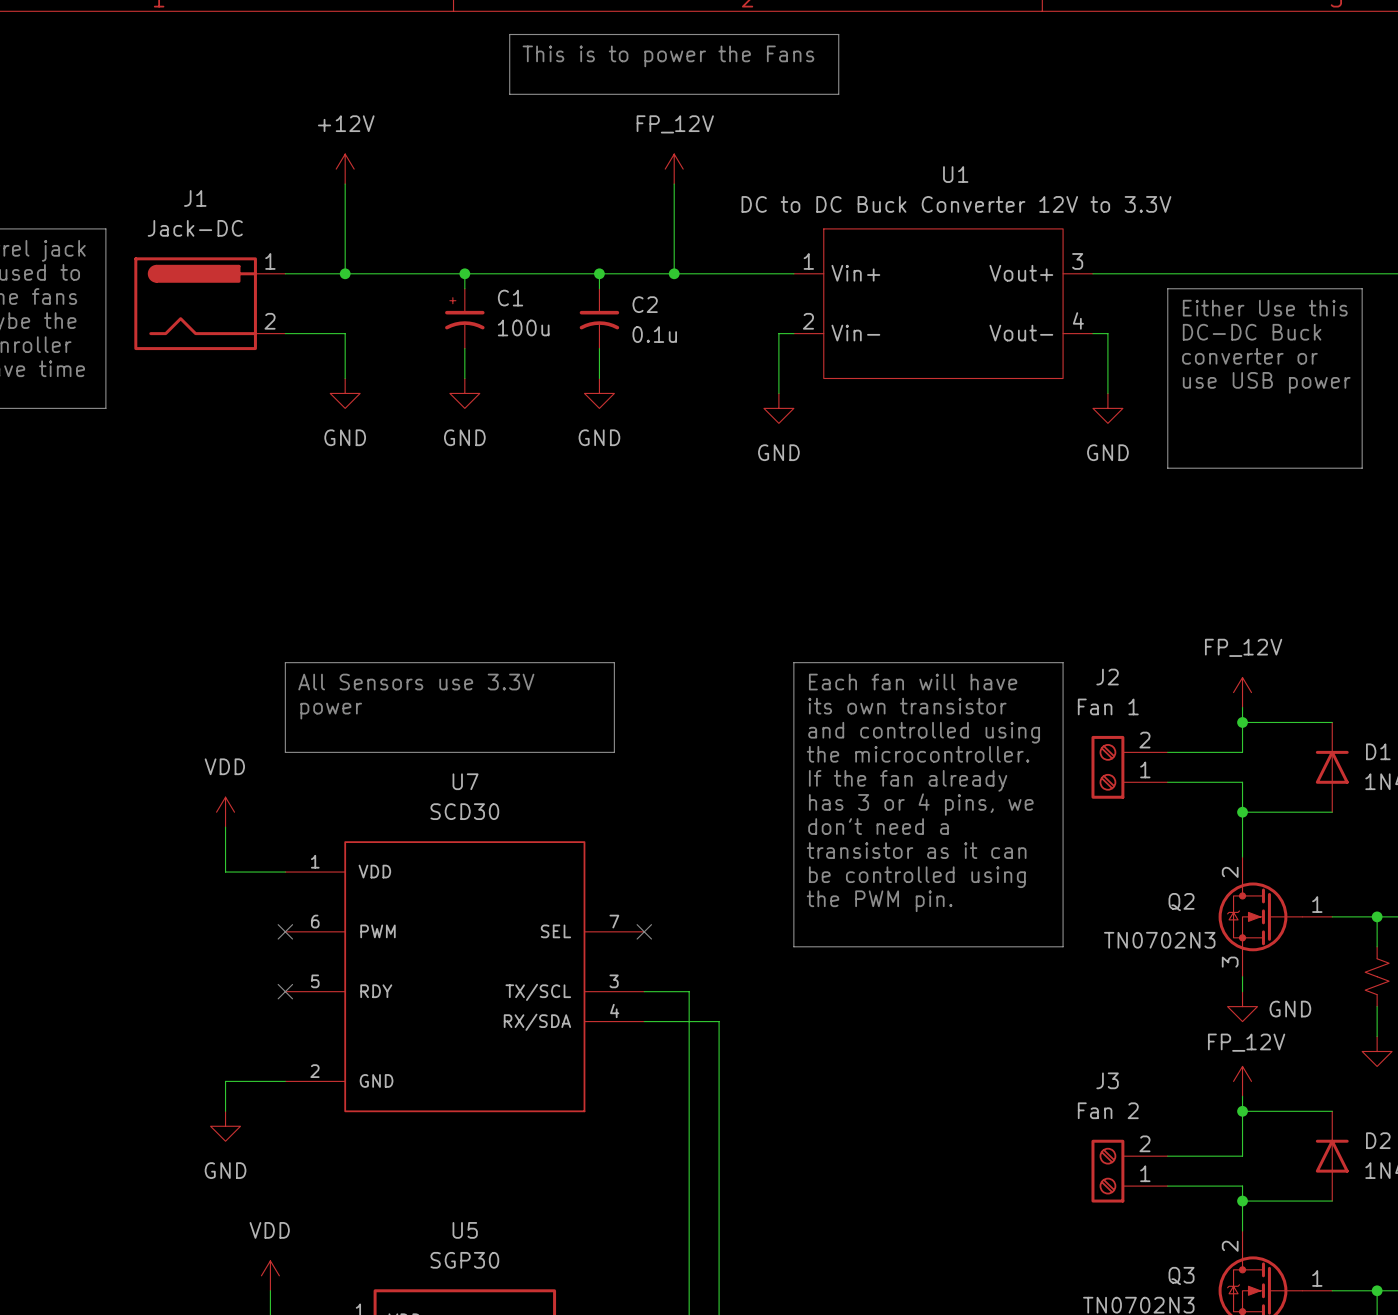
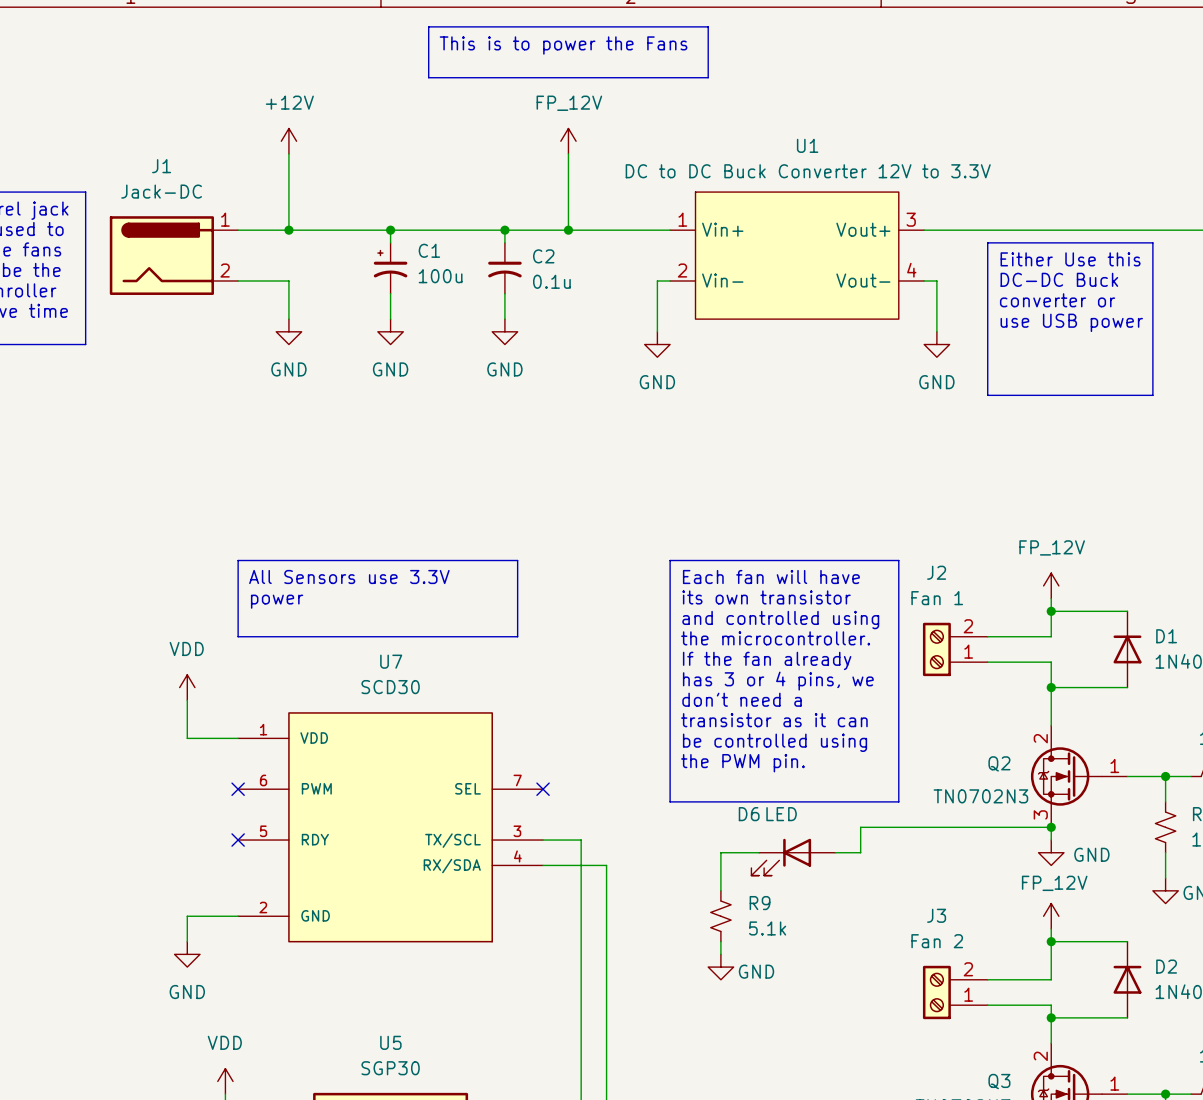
wire: none -> (1051, 827) (860, 827) (860, 852) (835, 852)
junction: none -> (1051, 827)
wire: none -> (759, 852) (720, 852) (720, 890)
D6: none -> LED (793, 857)
R9: none -> 5.1k (720, 916)
wire: none -> (720, 941) (720, 954)
power symbol: none -> GND (720, 967)

